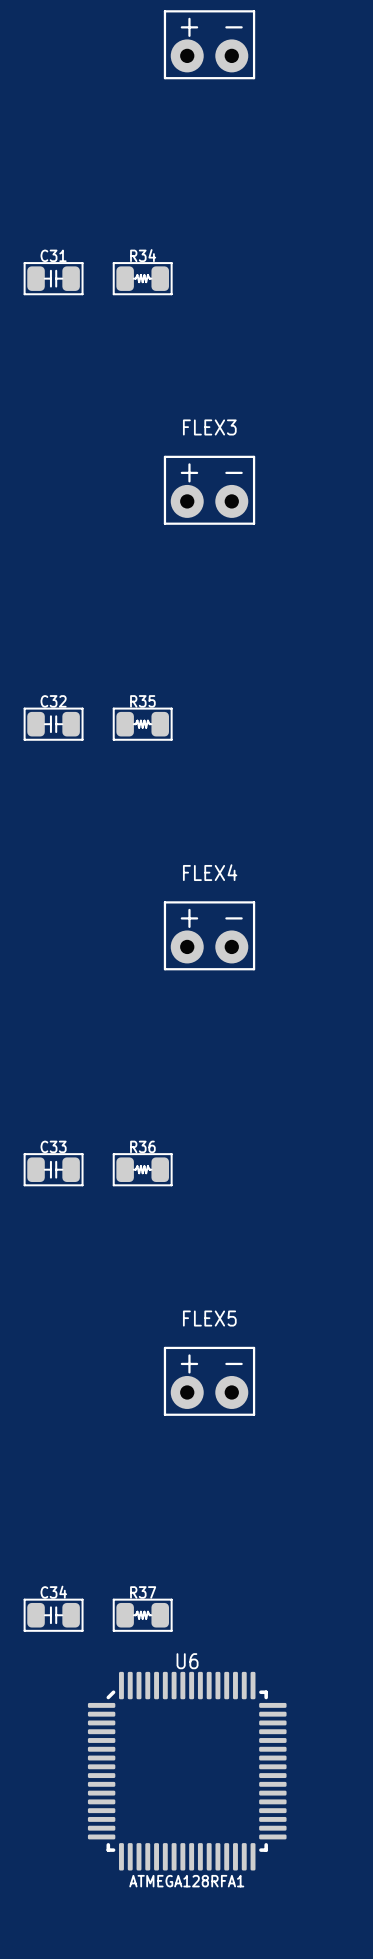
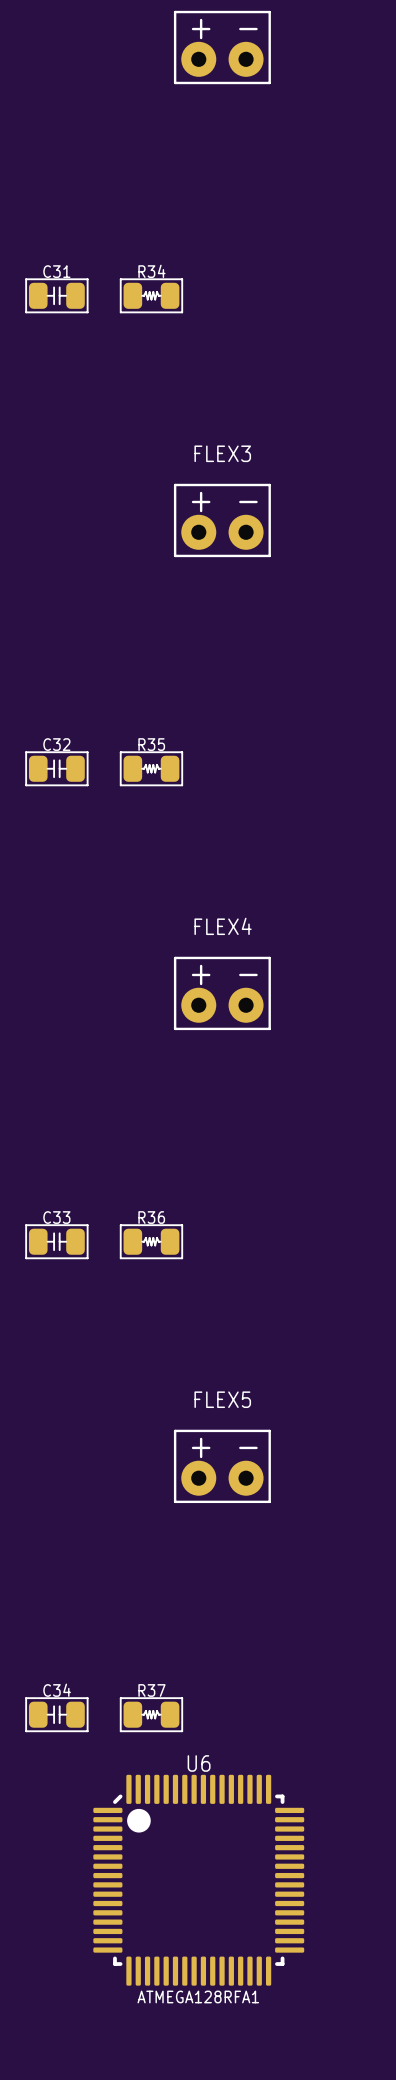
U6 footprint: [87, 1671, 287, 1871] -> [93, 1774, 305, 1986]

